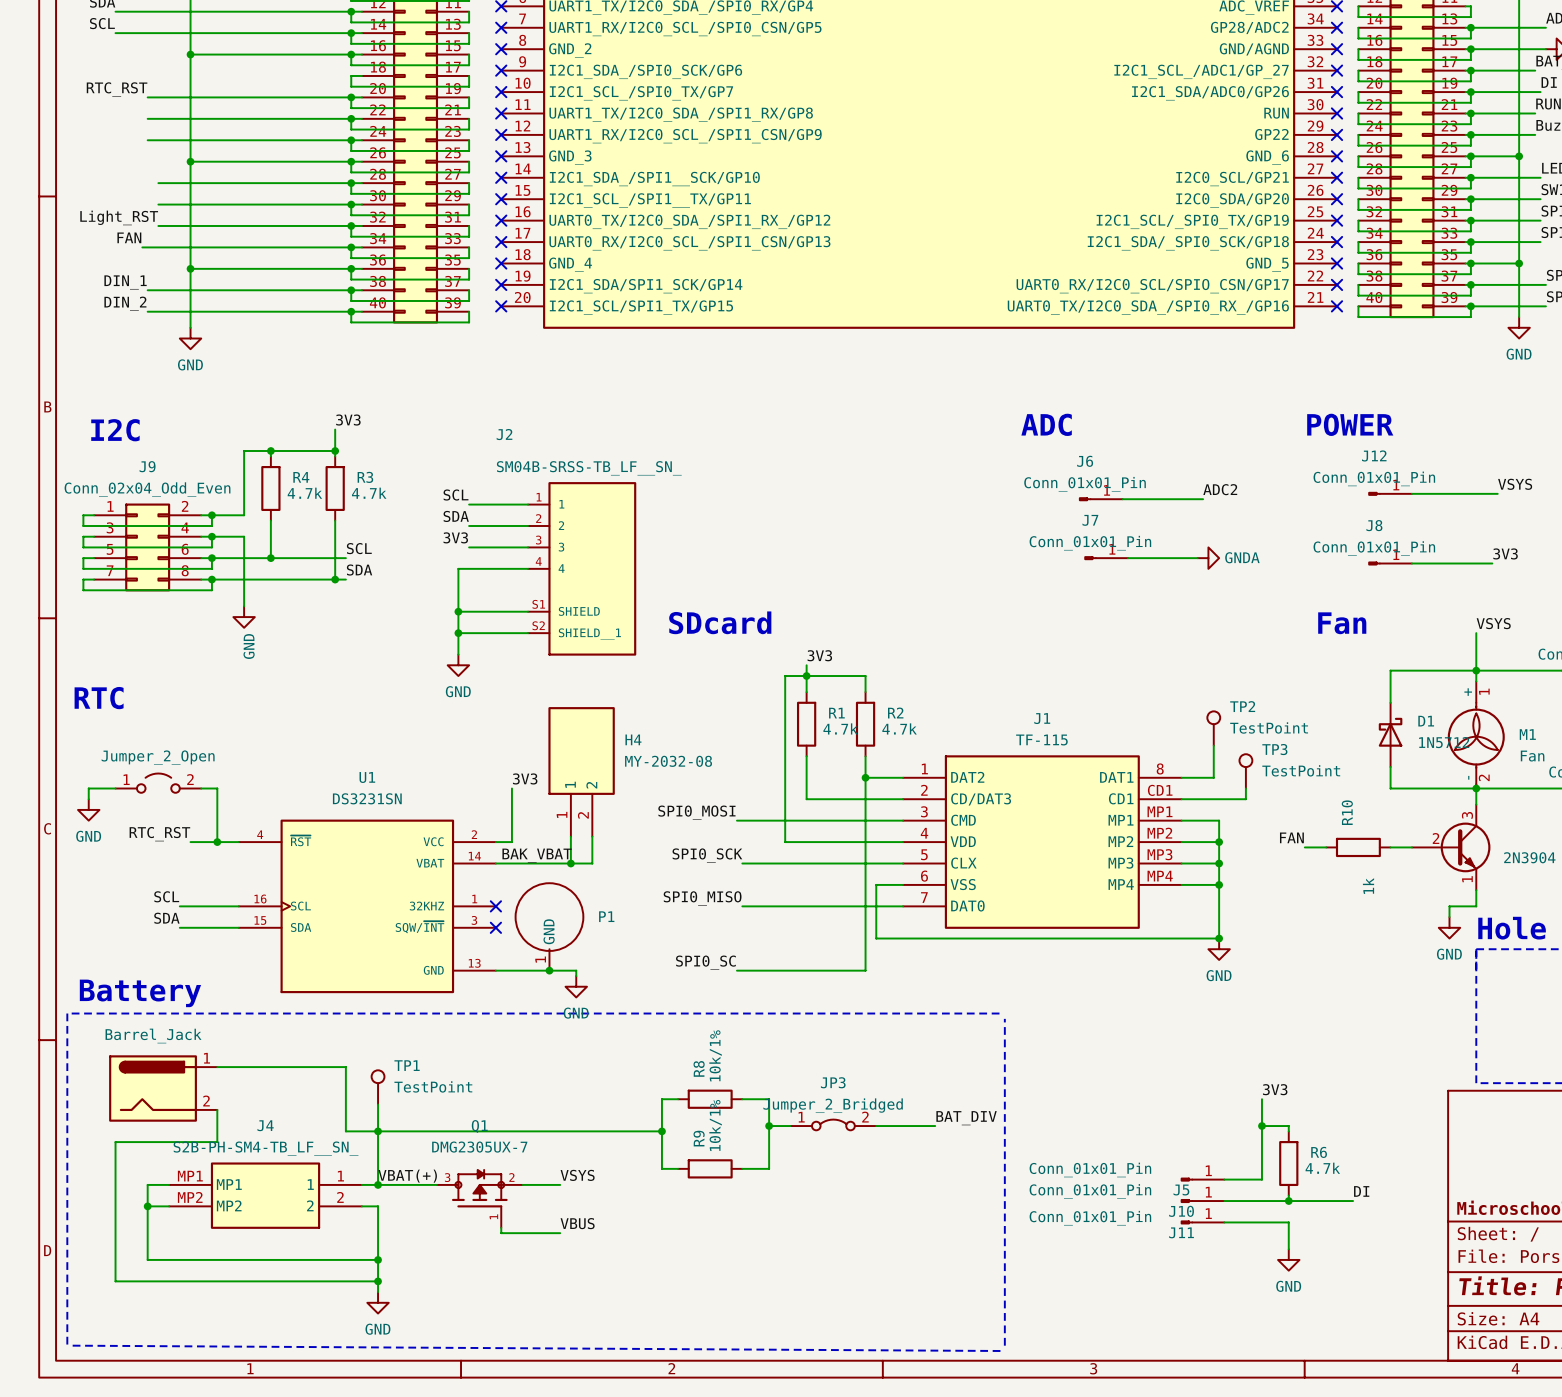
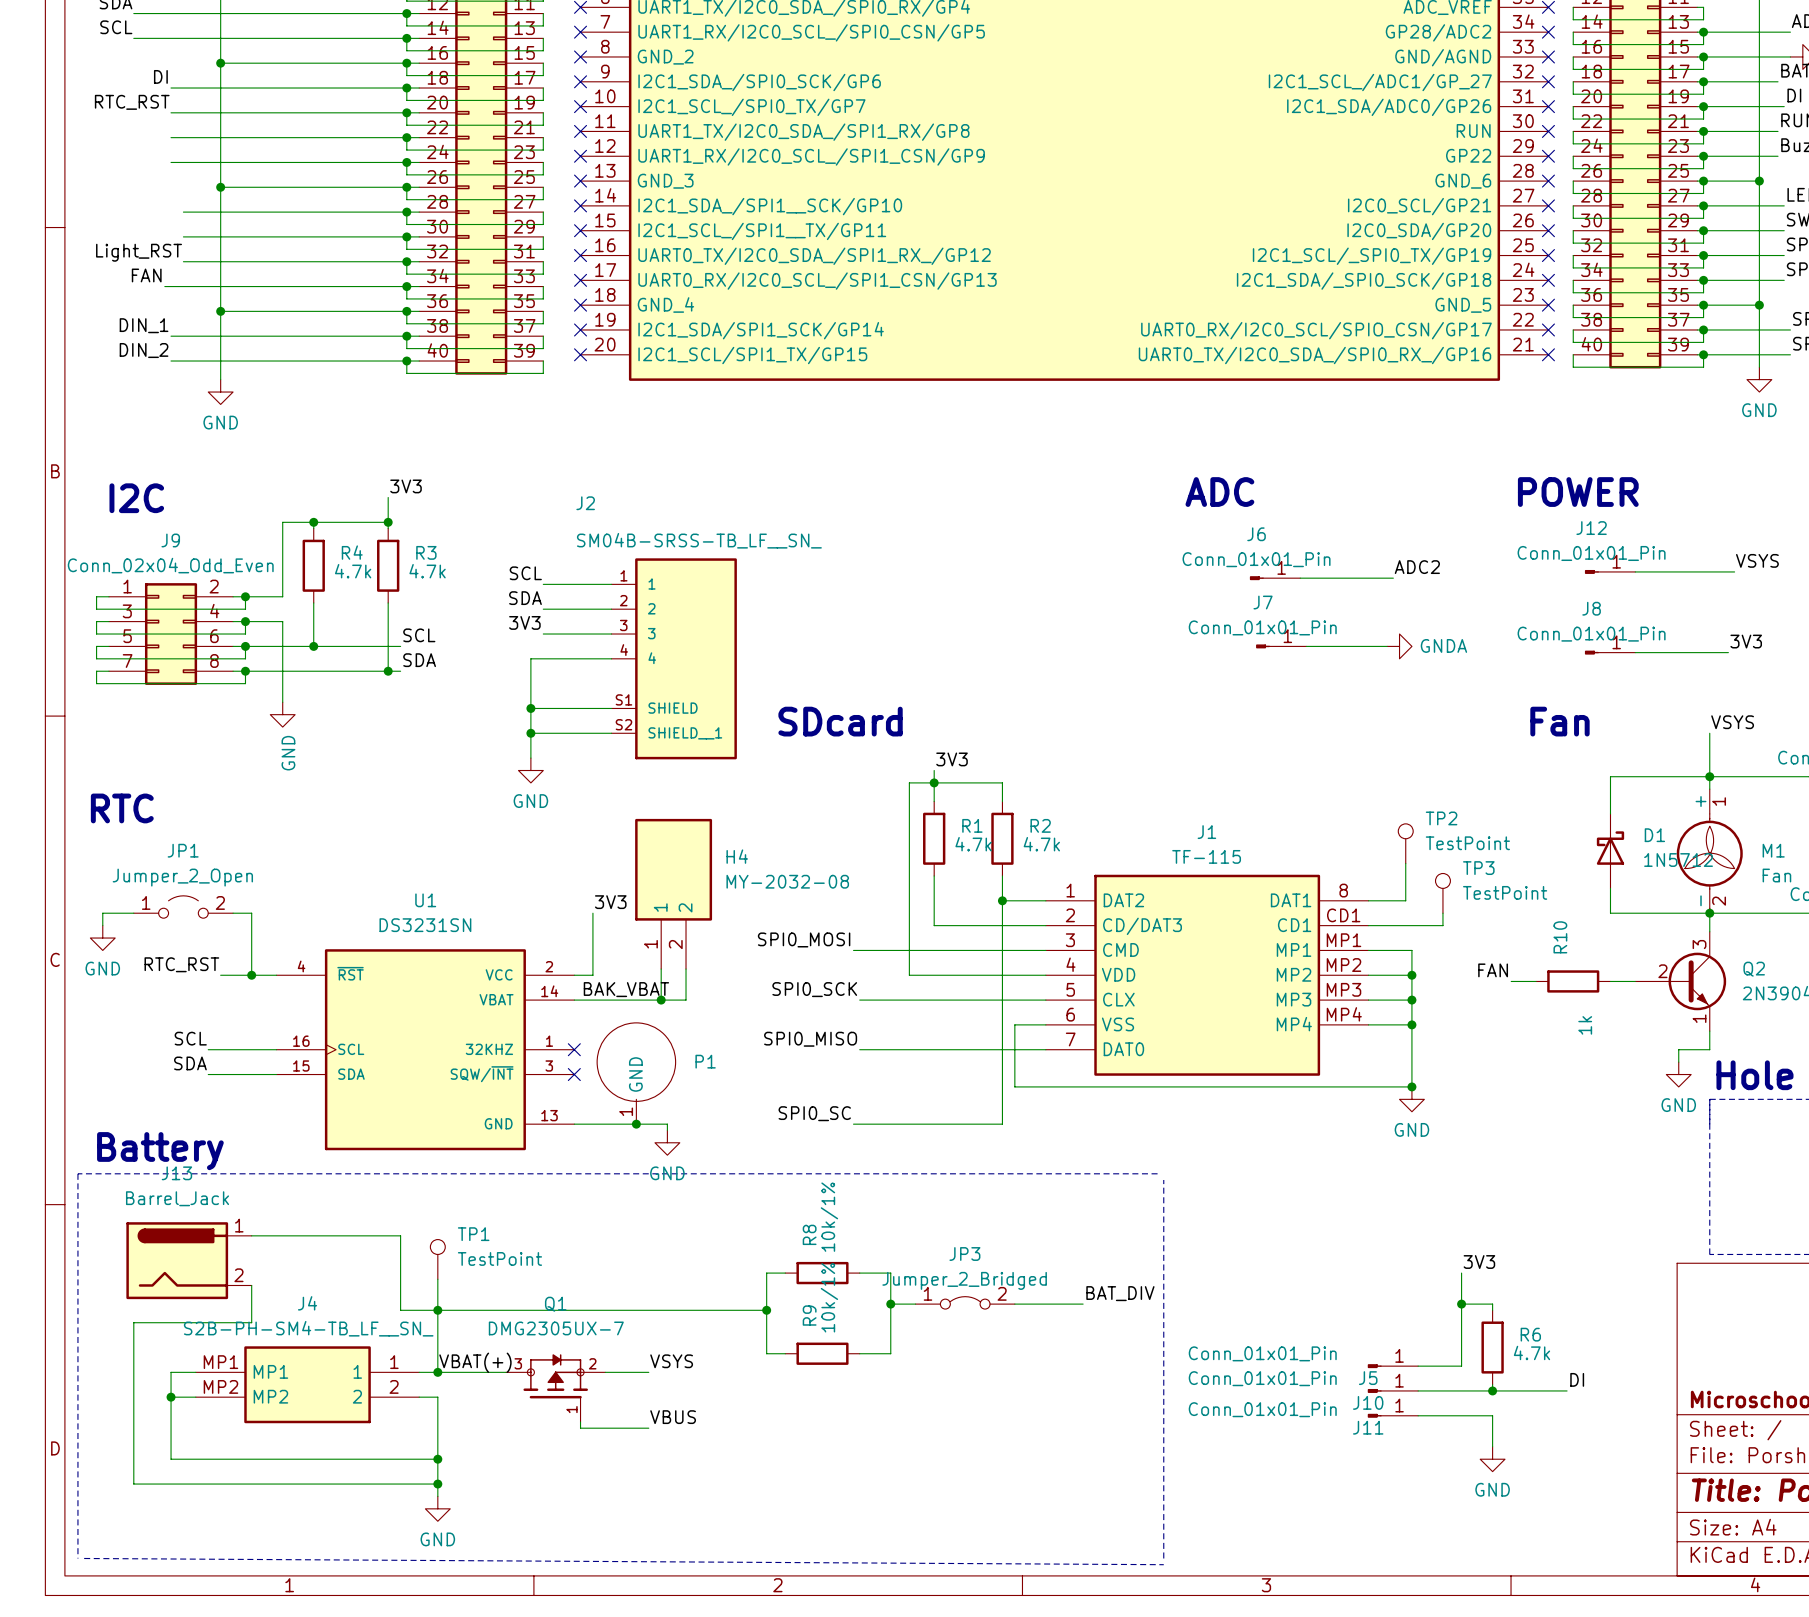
label: none -> DI (160, 76)
wire: none -> (171, 88) (406, 88)
junction: none -> (406, 88)
JP1 name: none -> JP1 (183, 850)
Q2 name: none -> Q2 (1754, 969)
J13 name: none -> J13 (176, 1173)

